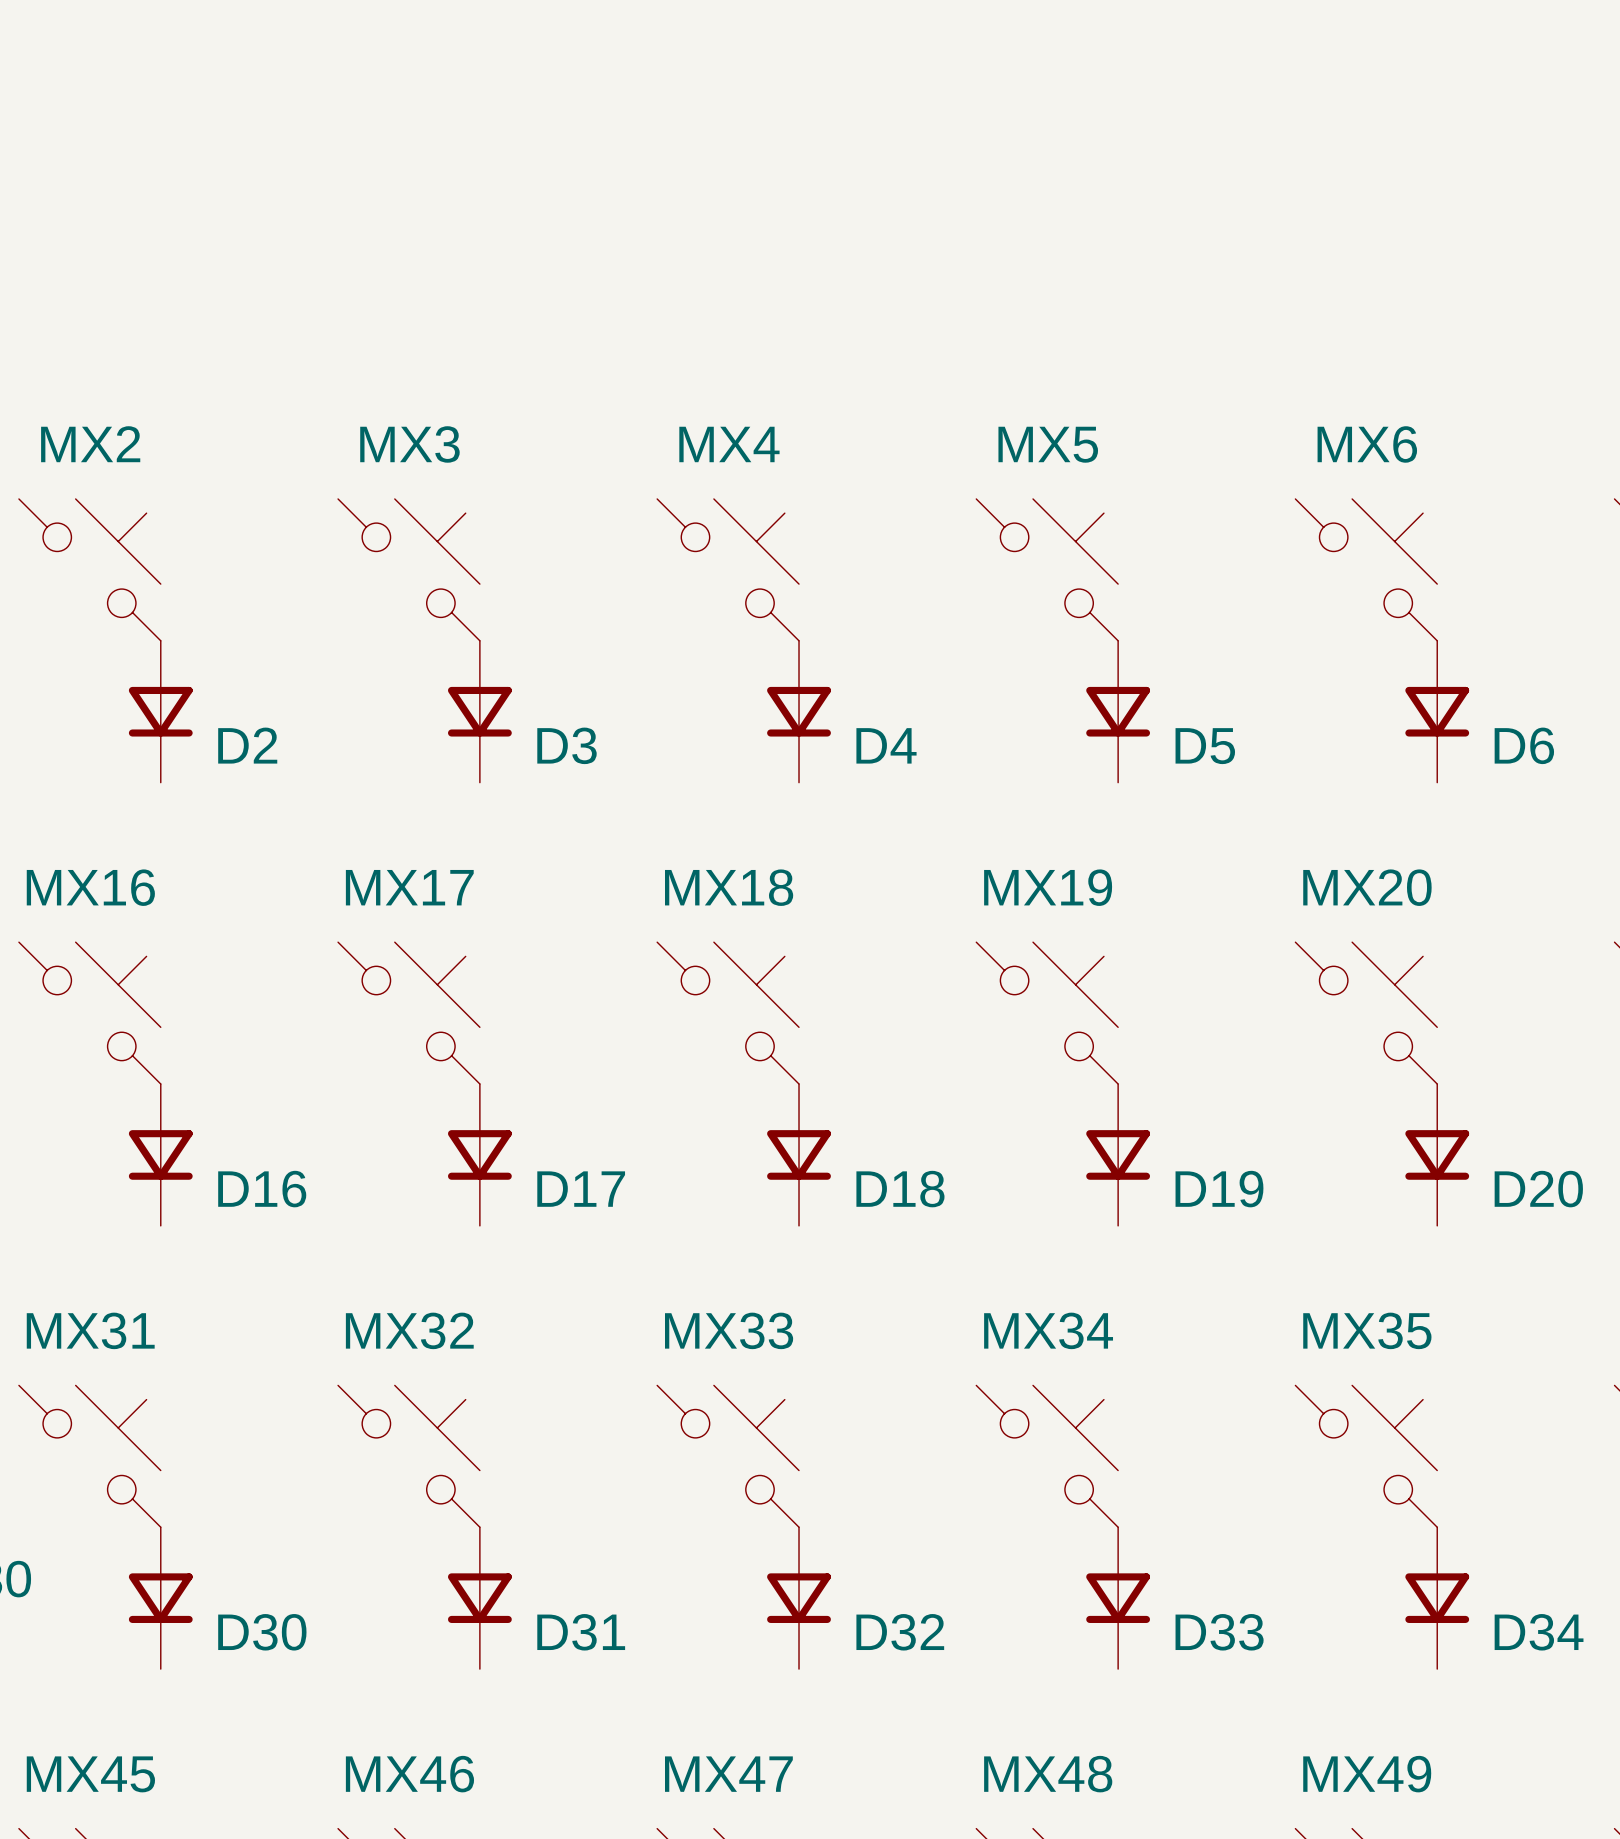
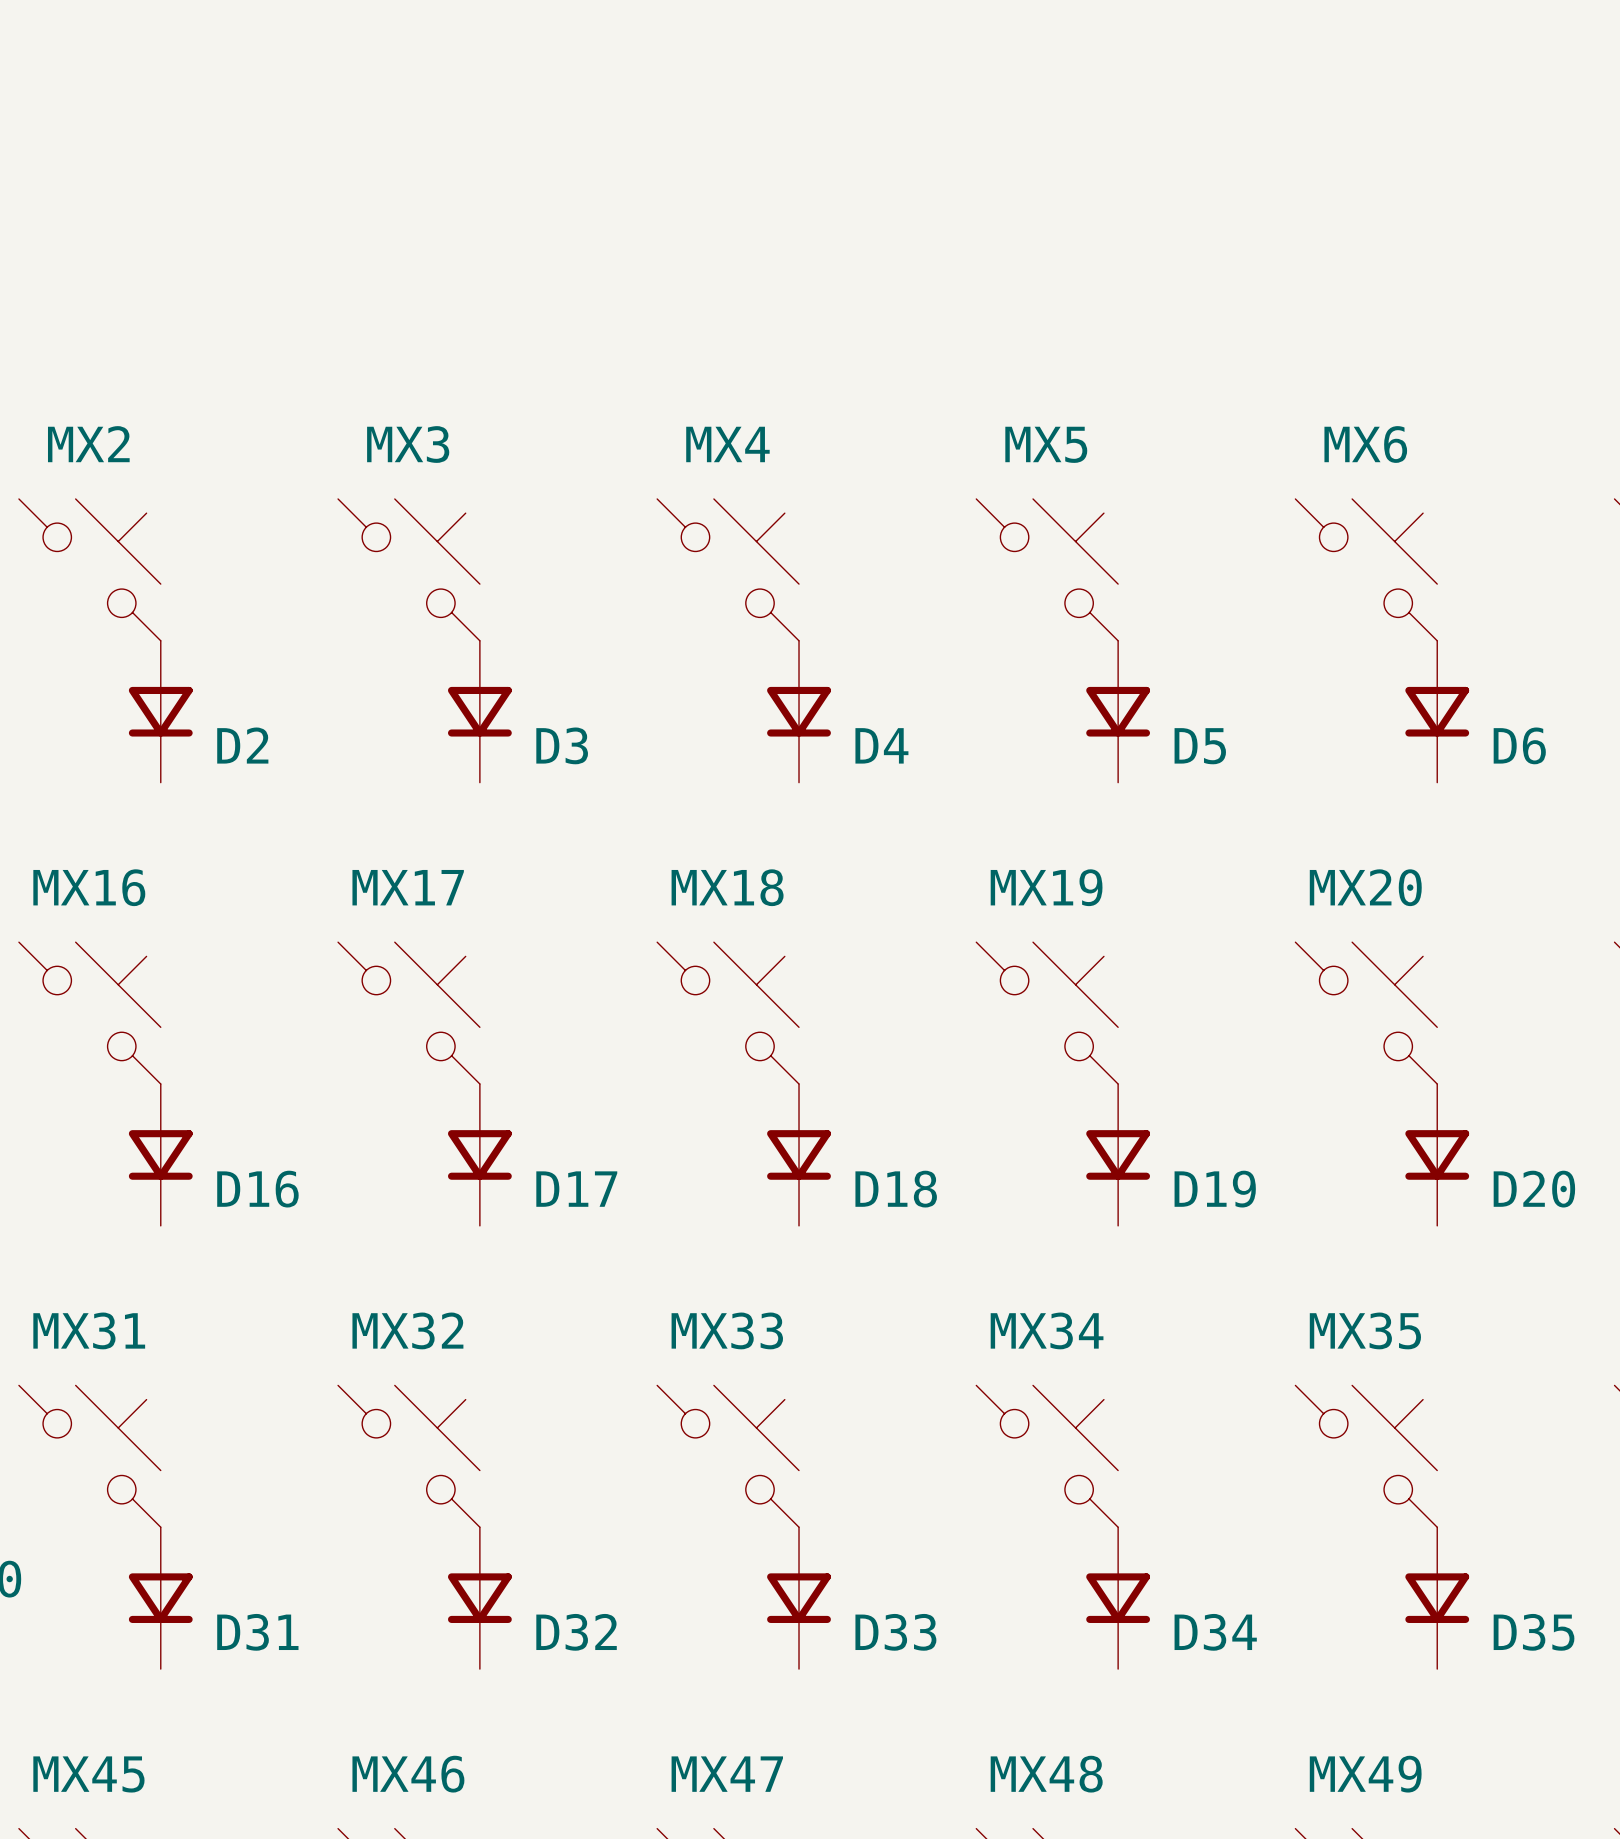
D30 name: D30 (262, 1632) -> D31 (257, 1632)
D31 name: D31 (581, 1632) -> D32 (576, 1632)
D32 name: D32 (900, 1632) -> D33 (895, 1632)
D33 name: D33 (1219, 1632) -> D34 (1215, 1632)
D34 name: D34 (1539, 1632) -> D35 (1534, 1632)

